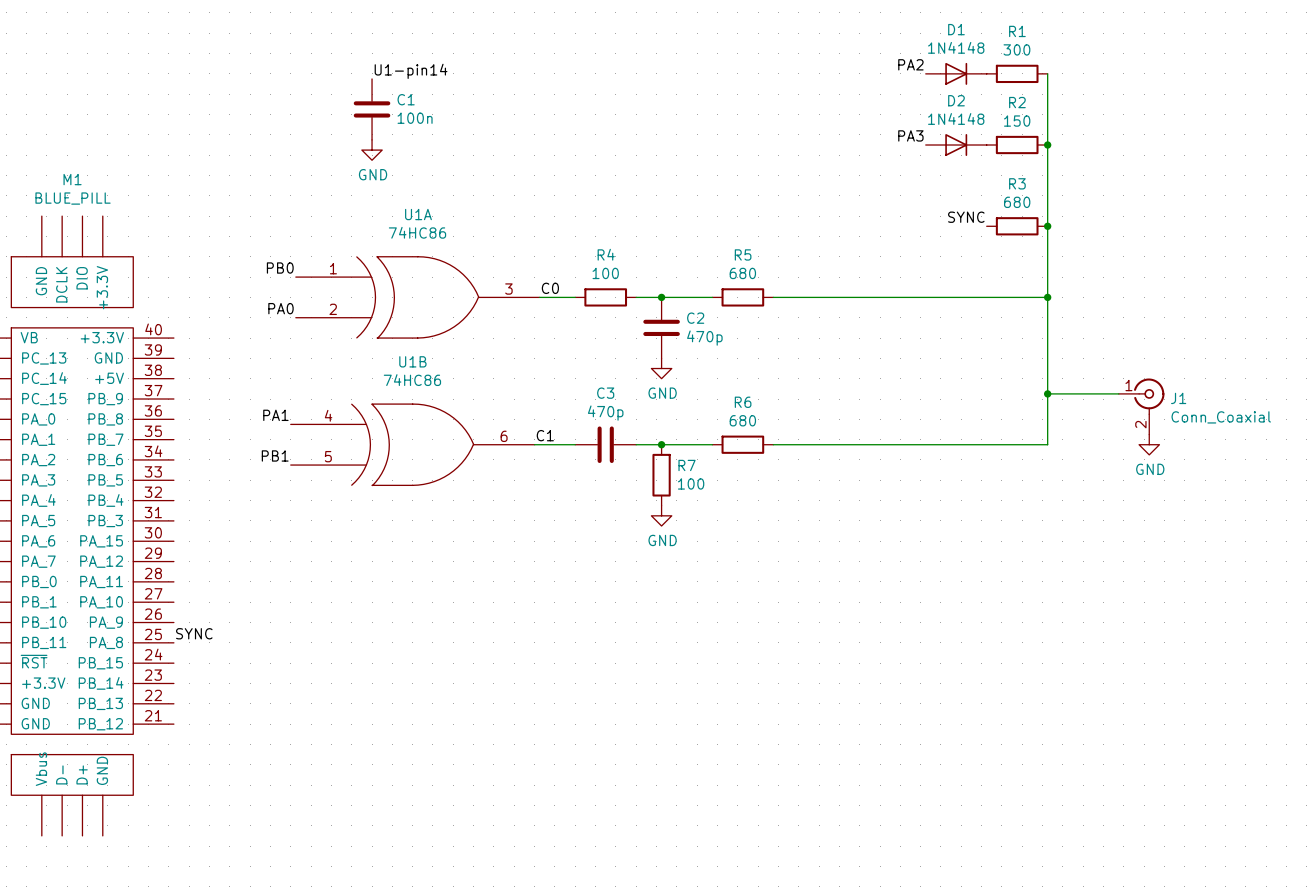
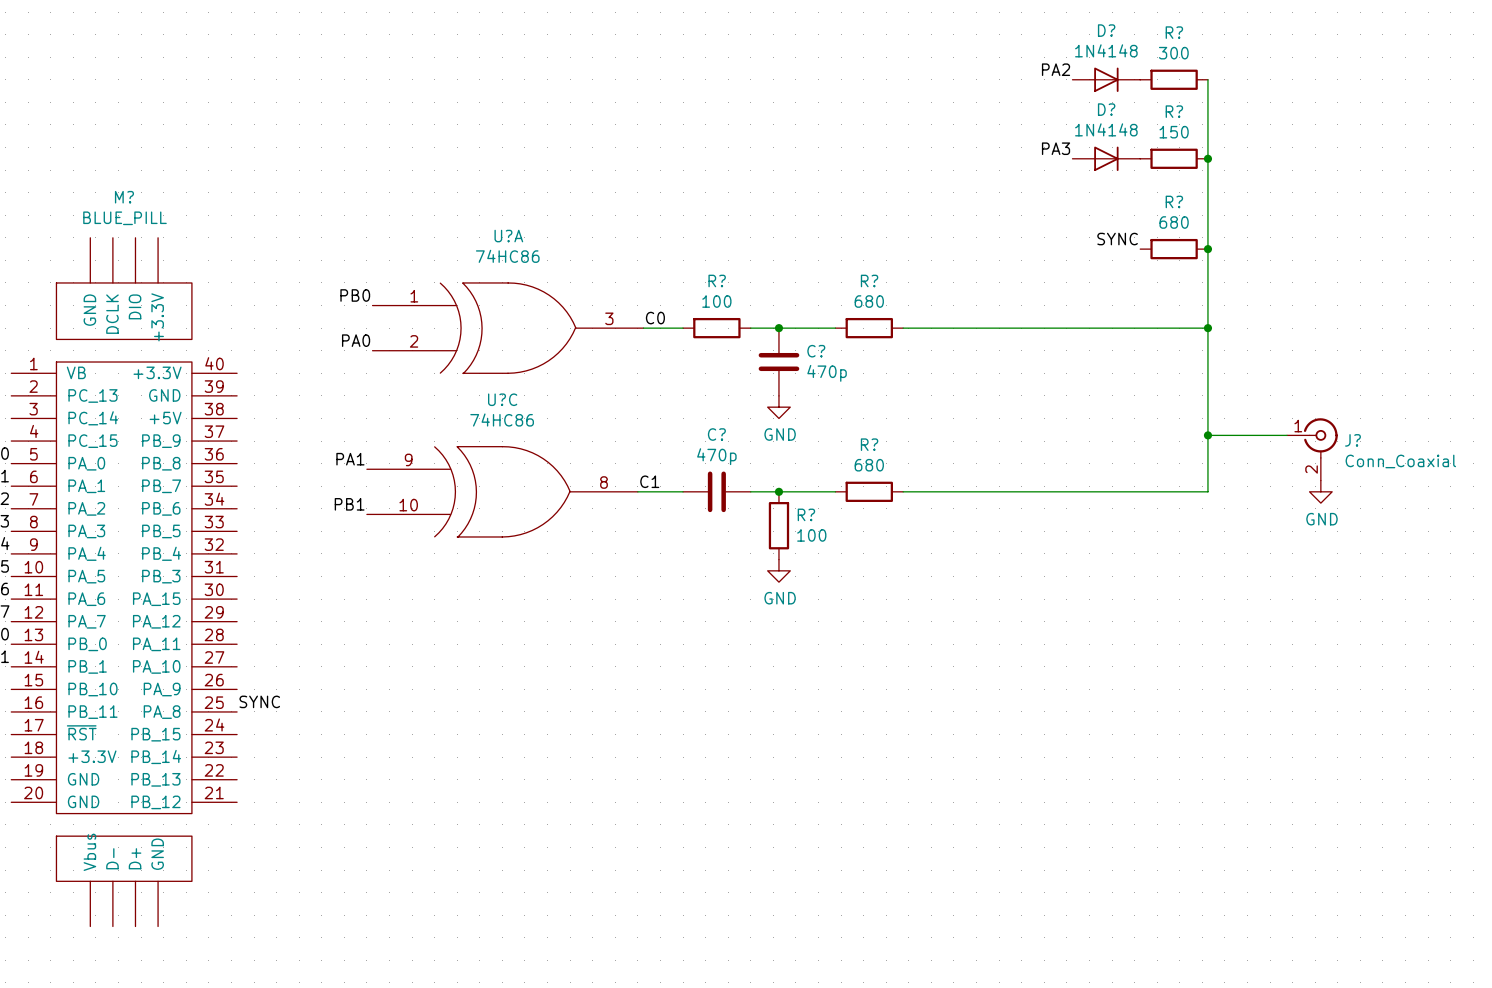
D1 name: D1 (956, 29) -> D? (1106, 30)
R1 name: R1 (1017, 31) -> R? (1174, 32)
label: U1-pin14 (411, 71) -> none
D2 name: D2 (956, 100) -> D? (1106, 109)
R2 name: R2 (1017, 102) -> R? (1174, 111)
C1: 100n (372, 109) -> none
power symbol: GND (372, 150) -> none
M1 name: M1 (72, 179) -> M? (124, 197)
R3 name: R3 (1017, 183) -> R? (1174, 201)
U1A name: U1A (418, 214) -> U?A (508, 236)
R4 name: R4 (606, 254) -> R? (717, 280)
R5 name: R5 (743, 254) -> R? (869, 280)
C2 name: C2 (695, 318) -> C? (816, 351)
U1B name: U1B (412, 361) -> U?C (502, 399)
C3 name: C3 (605, 393) -> C? (716, 434)
J1 name: J1 (1178, 398) -> J? (1352, 440)
R6 name: R6 (743, 402) -> R? (869, 444)
U1B pin number: 4 (328, 415) -> 9 (408, 459)
U1B pin number: 6 (504, 436) -> 8 (603, 482)
U1B pin number: 5 (328, 456) -> 10 (408, 505)
R7 name: R7 (687, 465) -> R? (806, 514)

